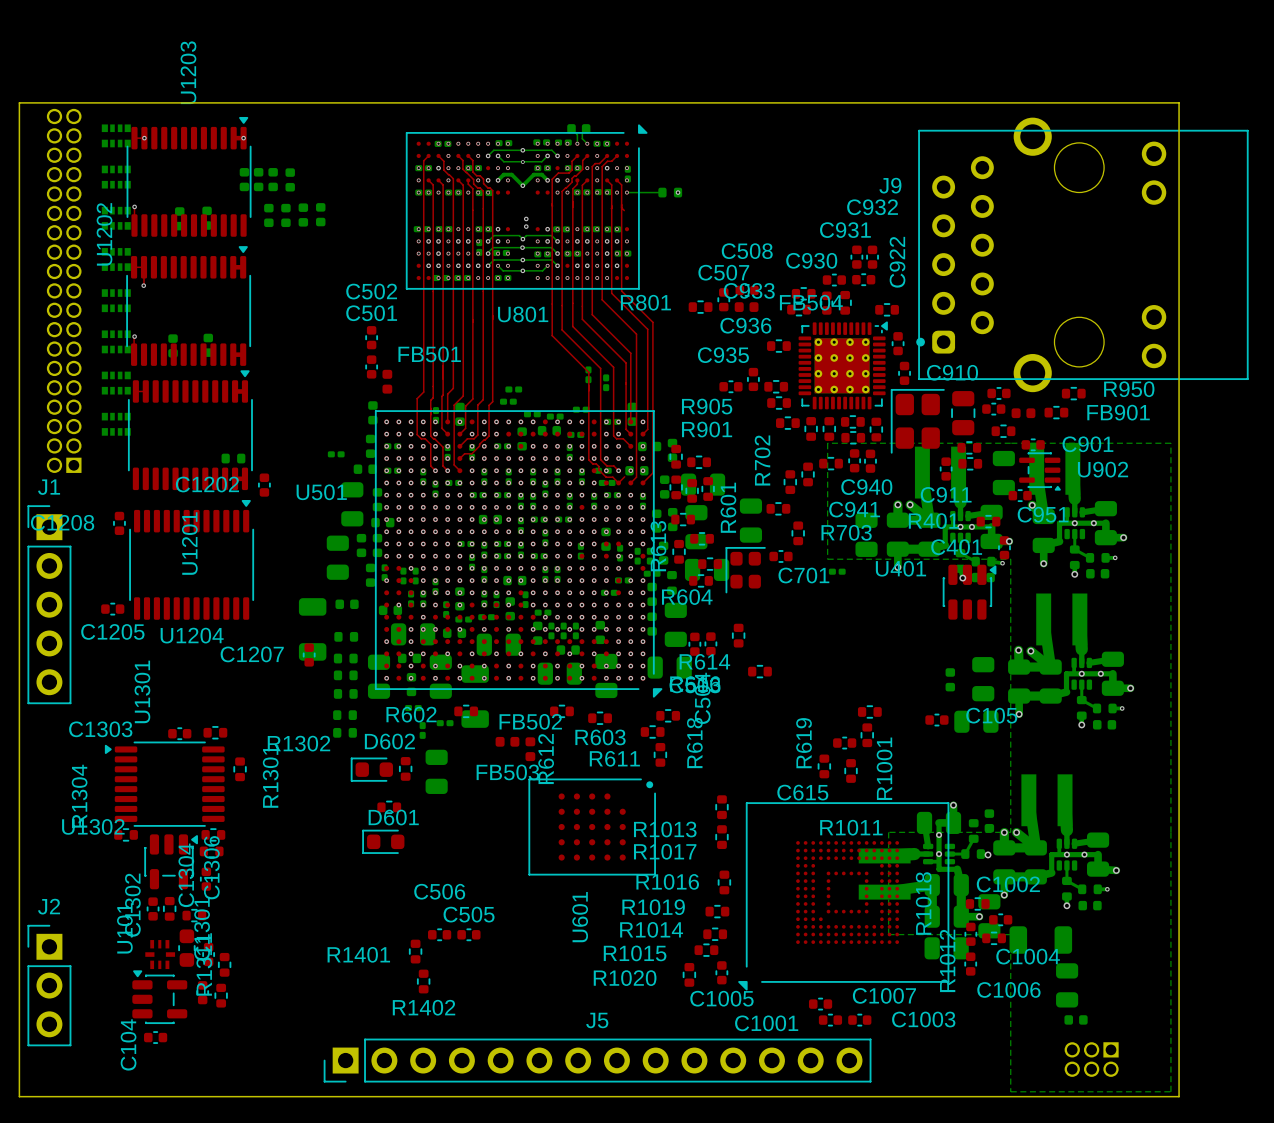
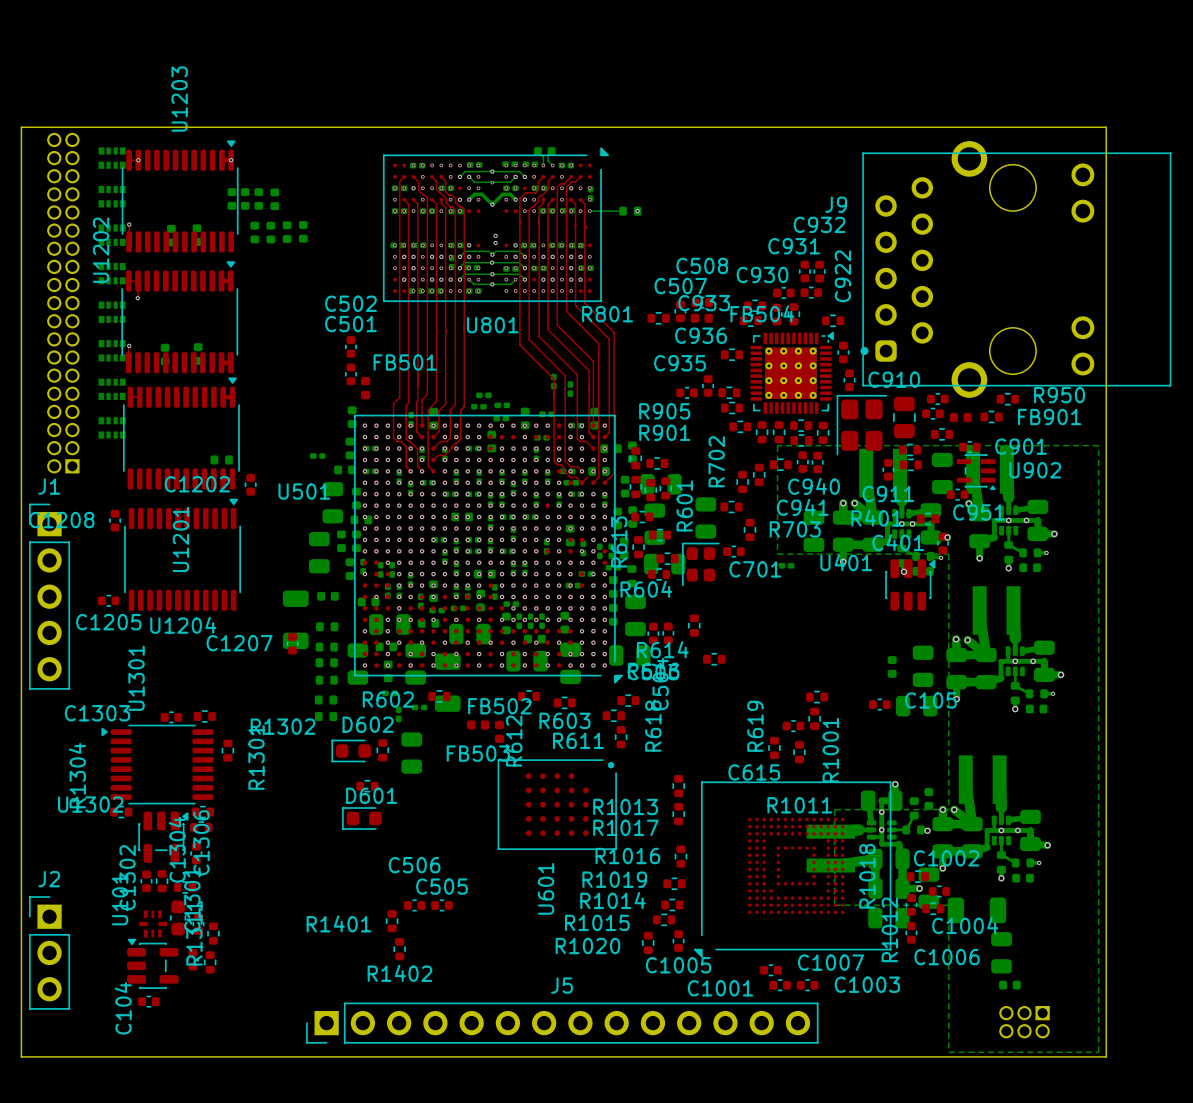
part: none -> (502, 405)
part footprint: [546, 413, 564, 420] -> [520, 407, 530, 430]
via: none -> (444, 425)
via: none -> (513, 425)
part: (549, 430) -> none
via: none -> (479, 437)
via: none -> (524, 437)

